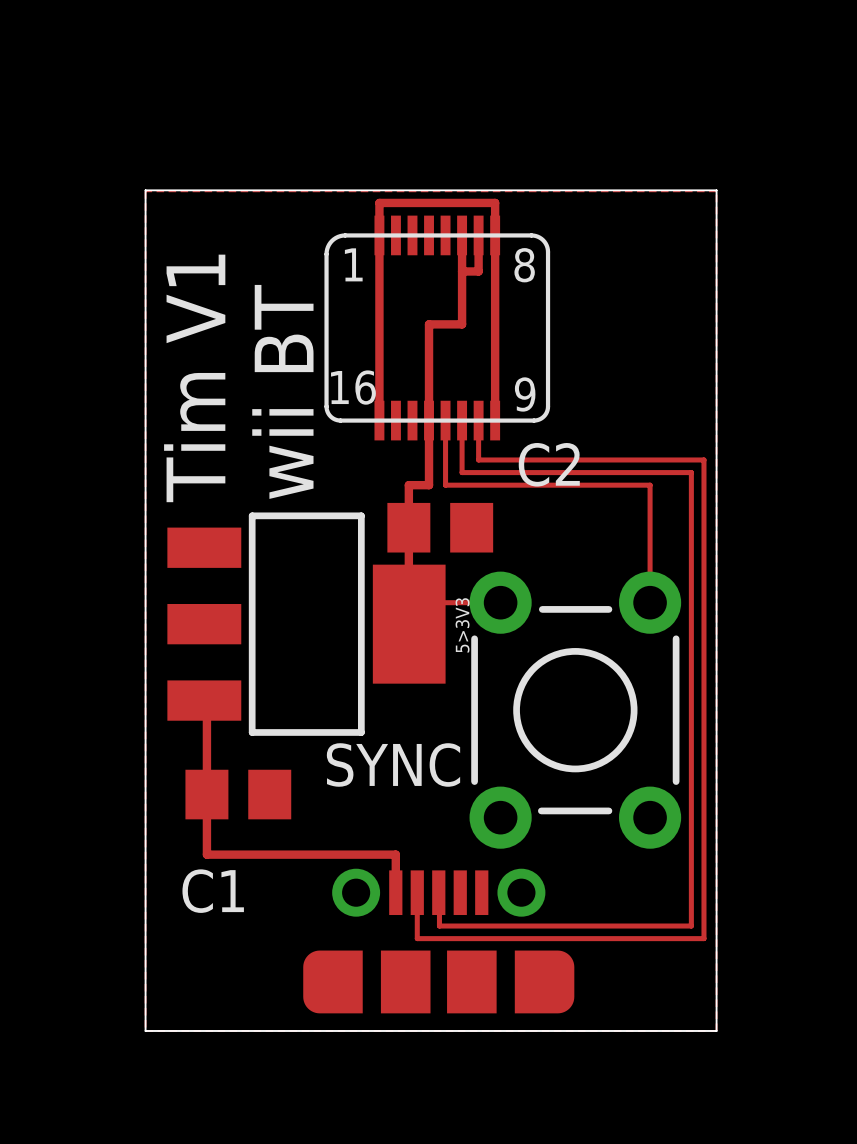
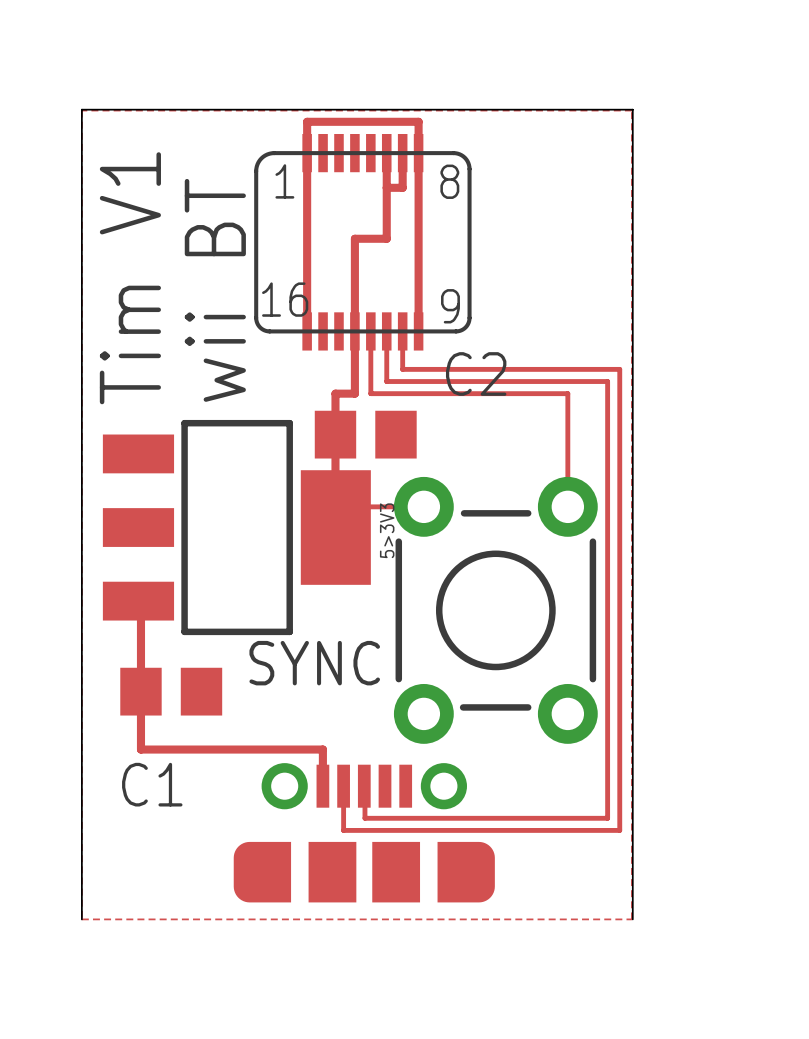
board edge: (716, 190) (716, 1030) (145, 1030) -> (631, 109) (632, 919)

